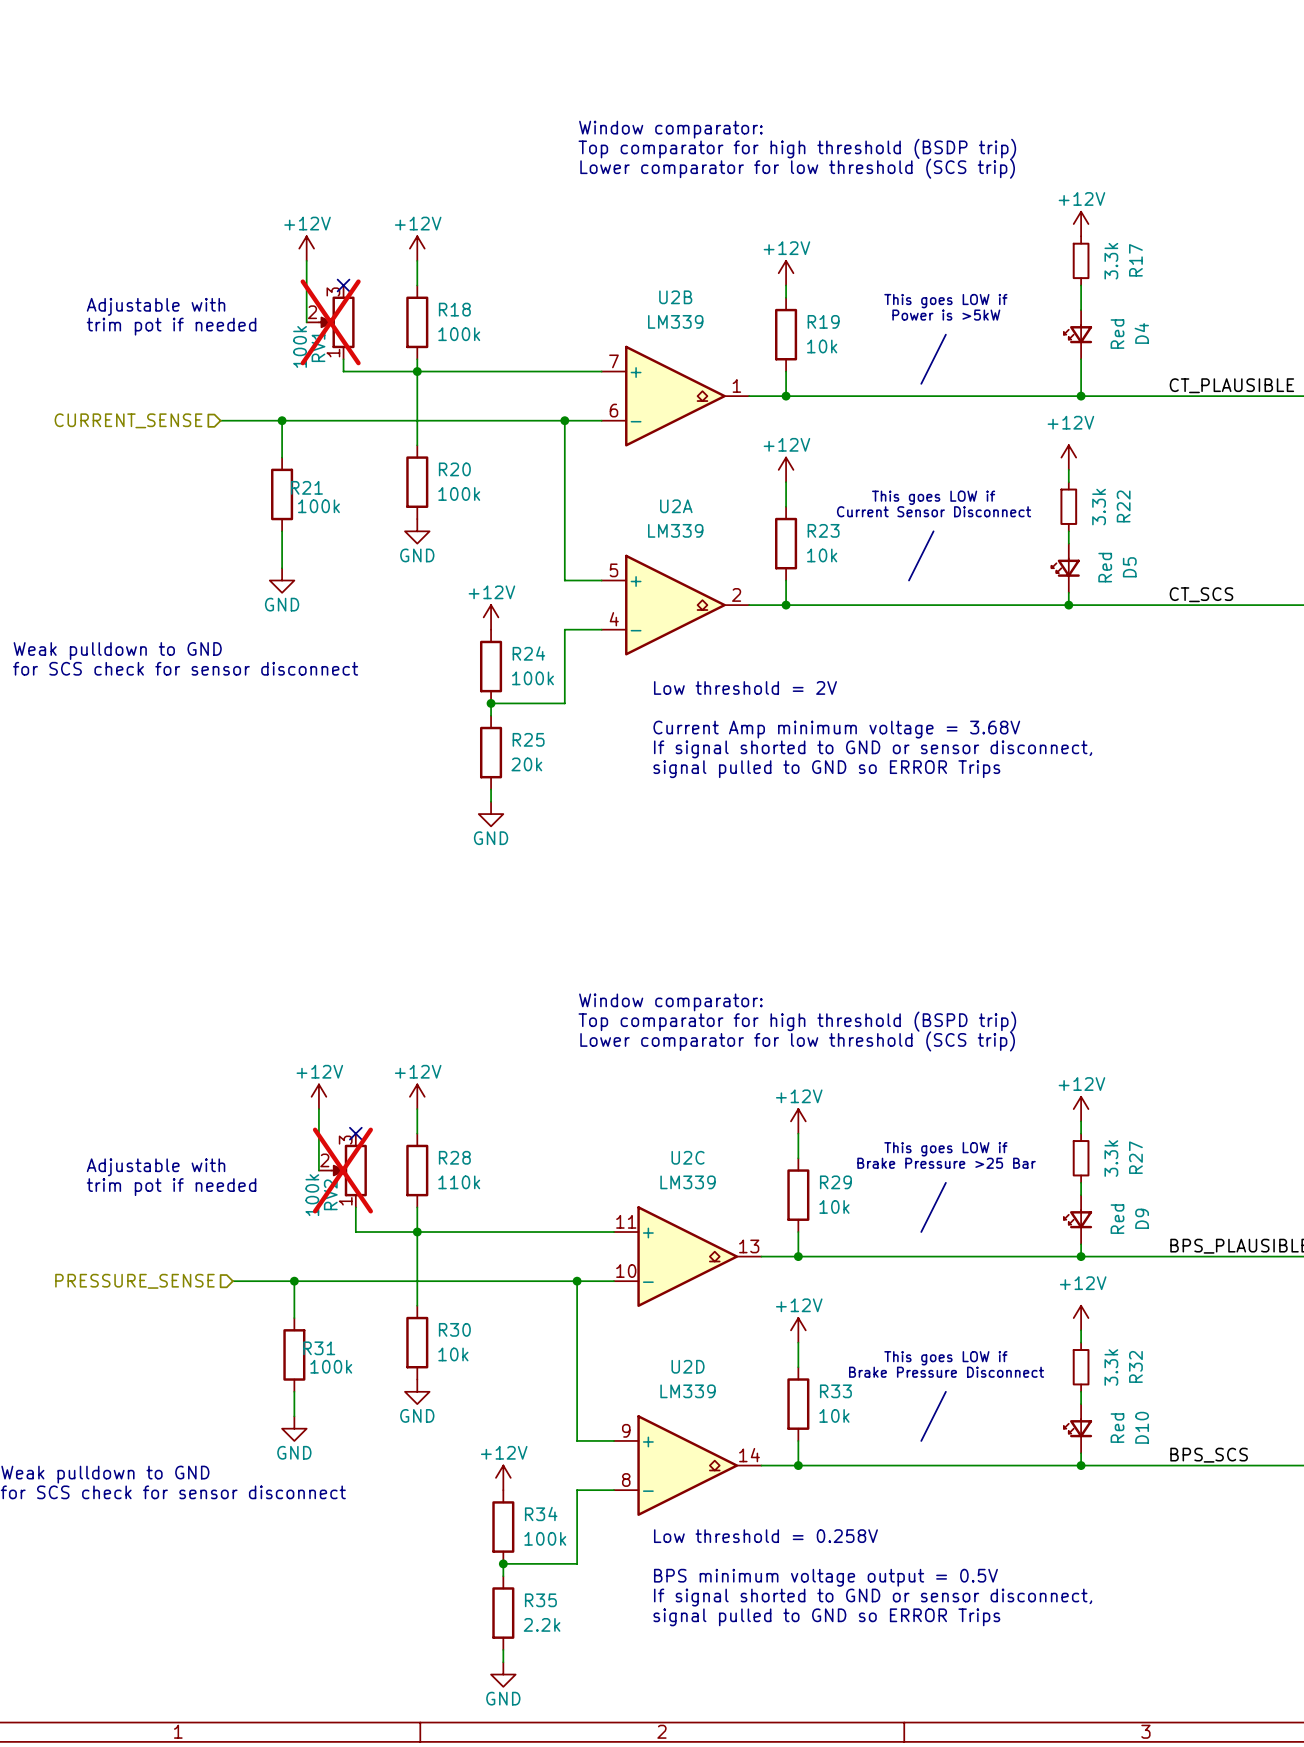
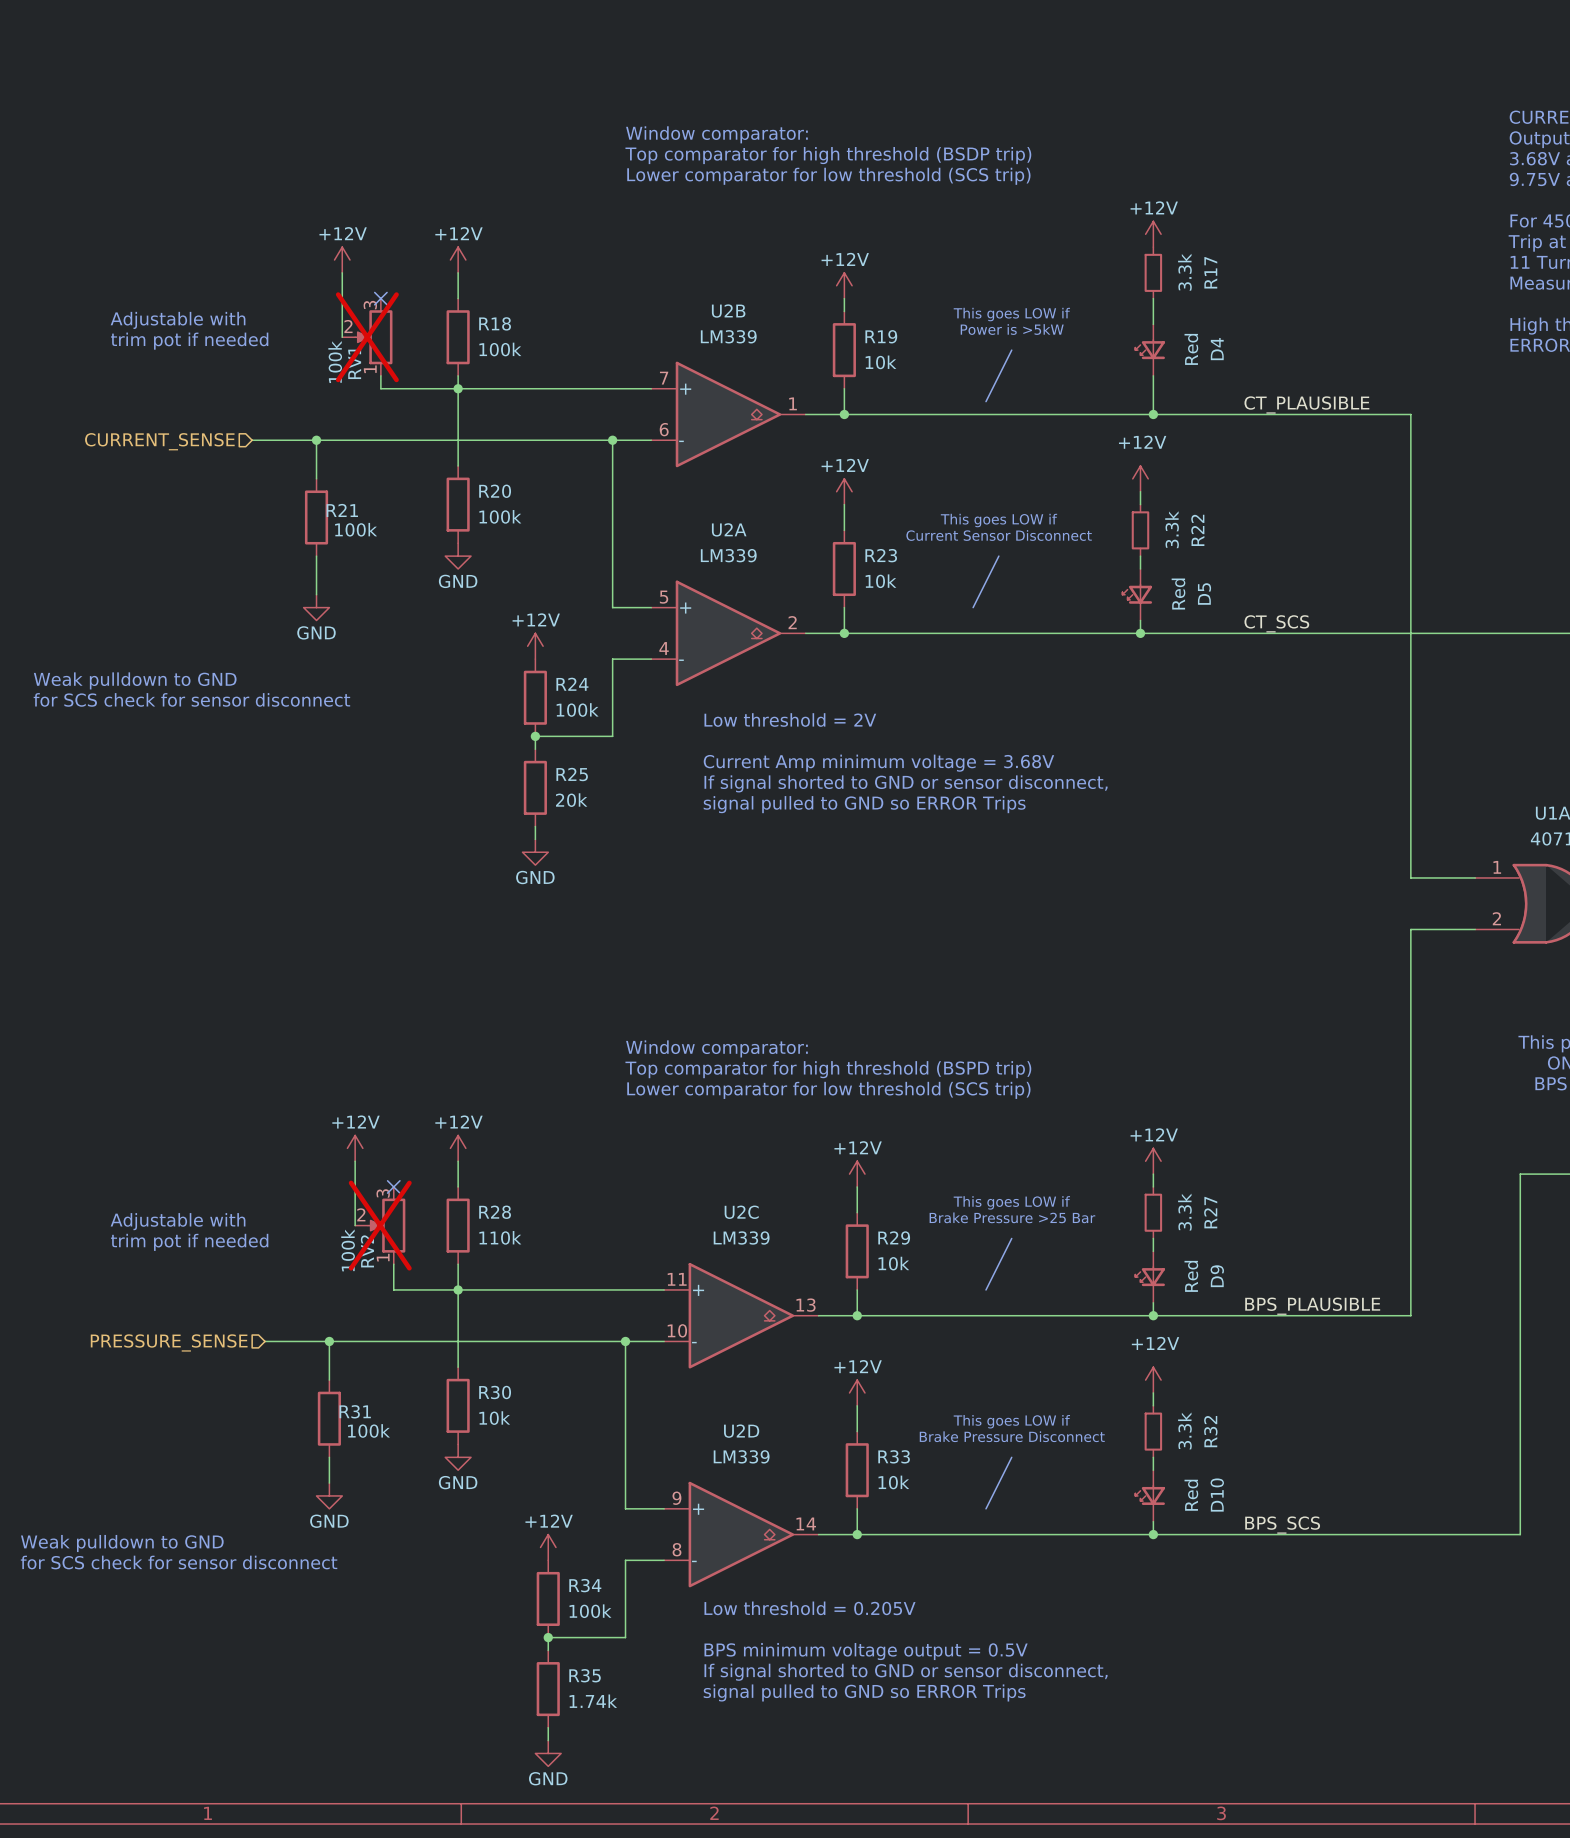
text: Low threshold = 0.258V (765, 1536) -> Low threshold = 0.205V (810, 1608)
R35 value: 2.2k (542, 1624) -> 1.74k (593, 1701)

